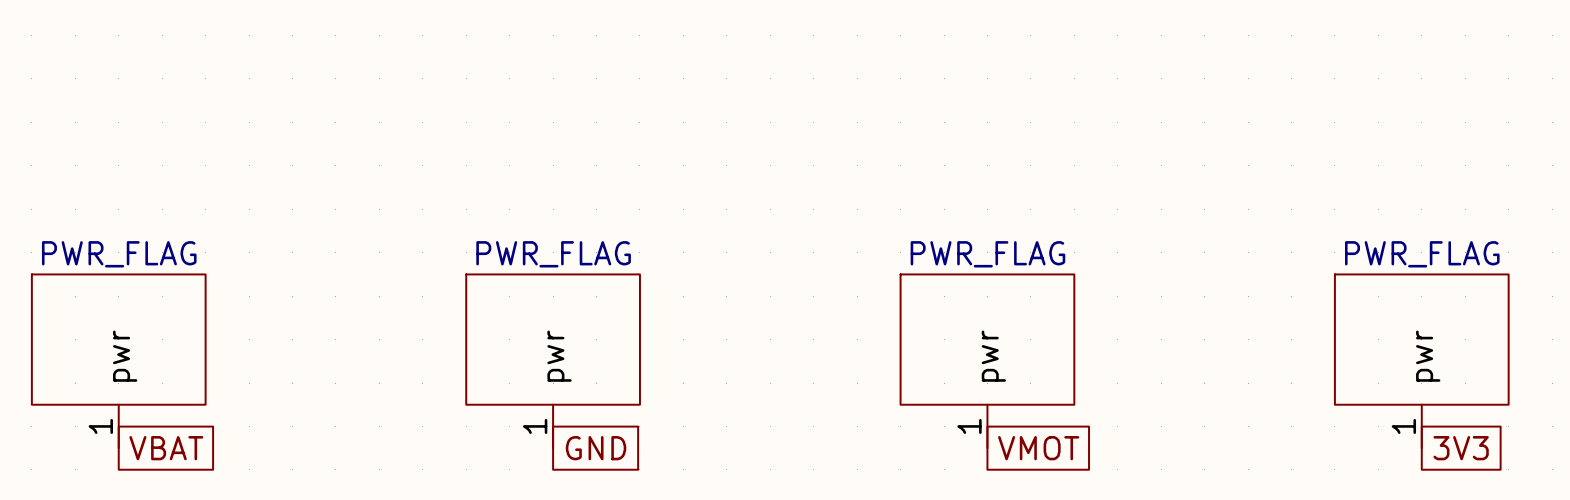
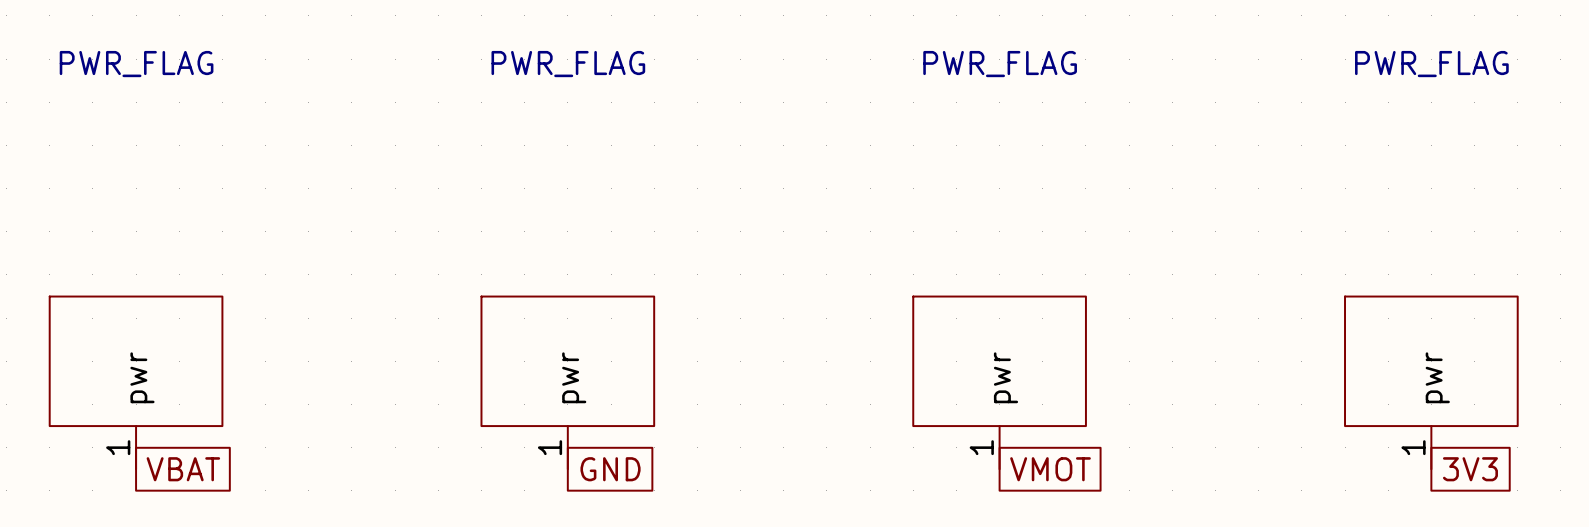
power symbol text position: PWR_FLAG (119, 254) -> PWR_FLAG (136, 64)
power symbol text position: PWR_FLAG (553, 254) -> PWR_FLAG (568, 64)
power symbol text position: PWR_FLAG (987, 254) -> PWR_FLAG (1000, 64)
power symbol text position: PWR_FLAG (1422, 254) -> PWR_FLAG (1431, 64)

